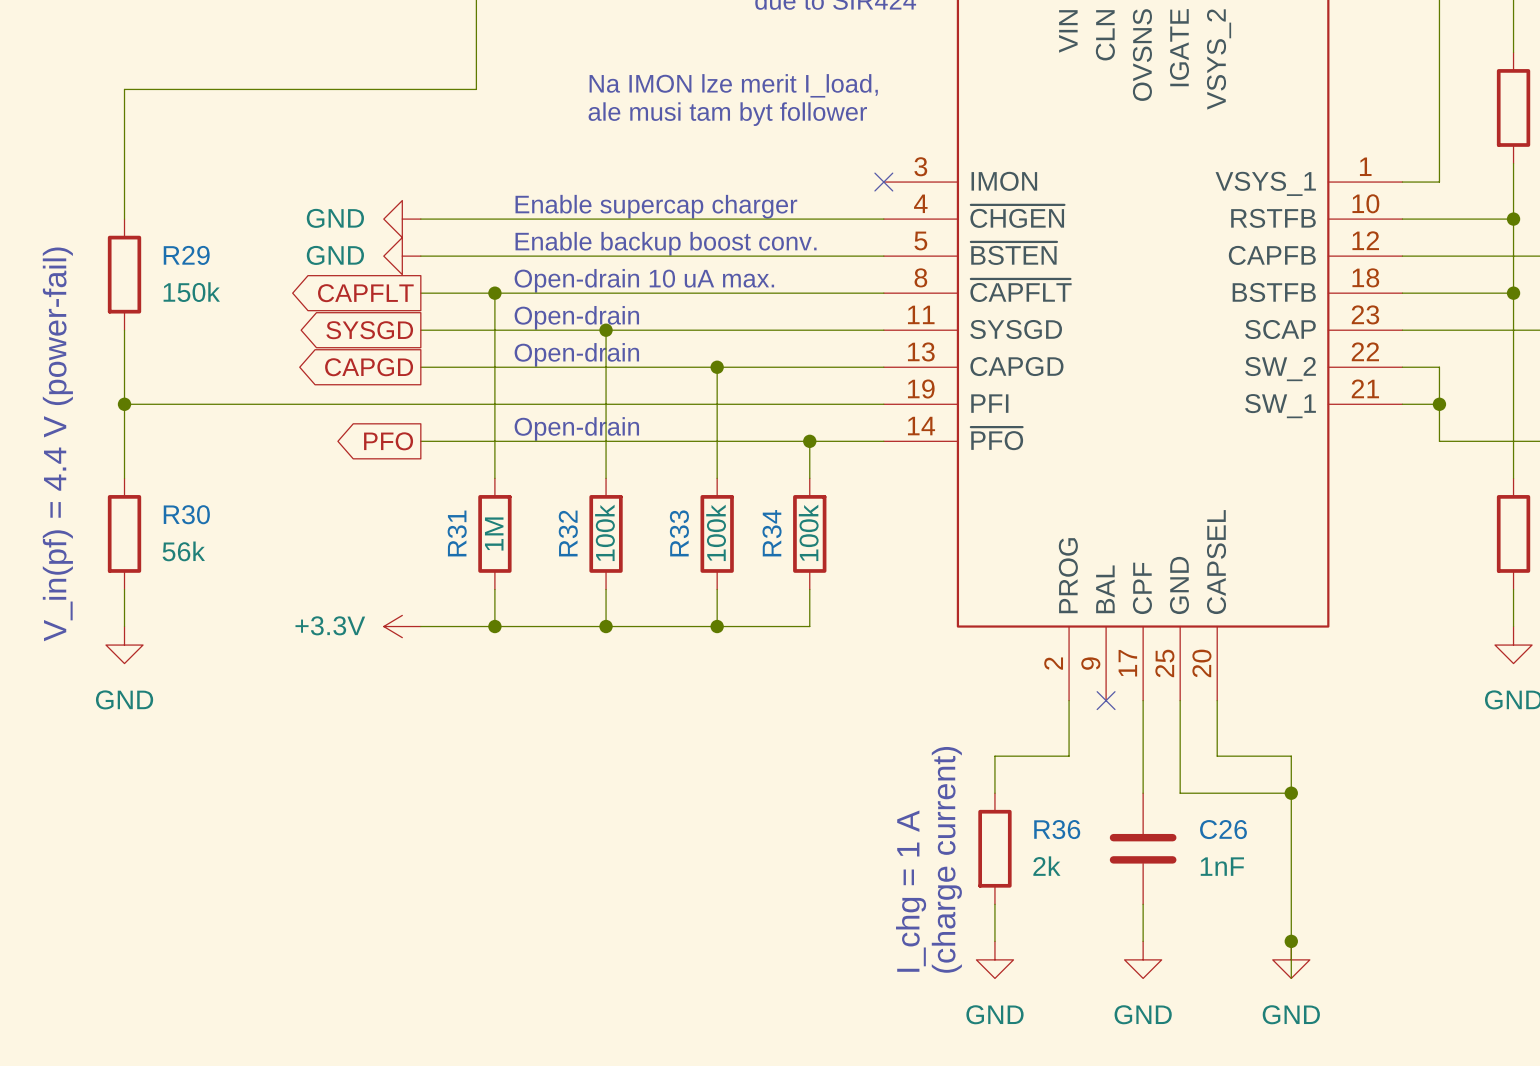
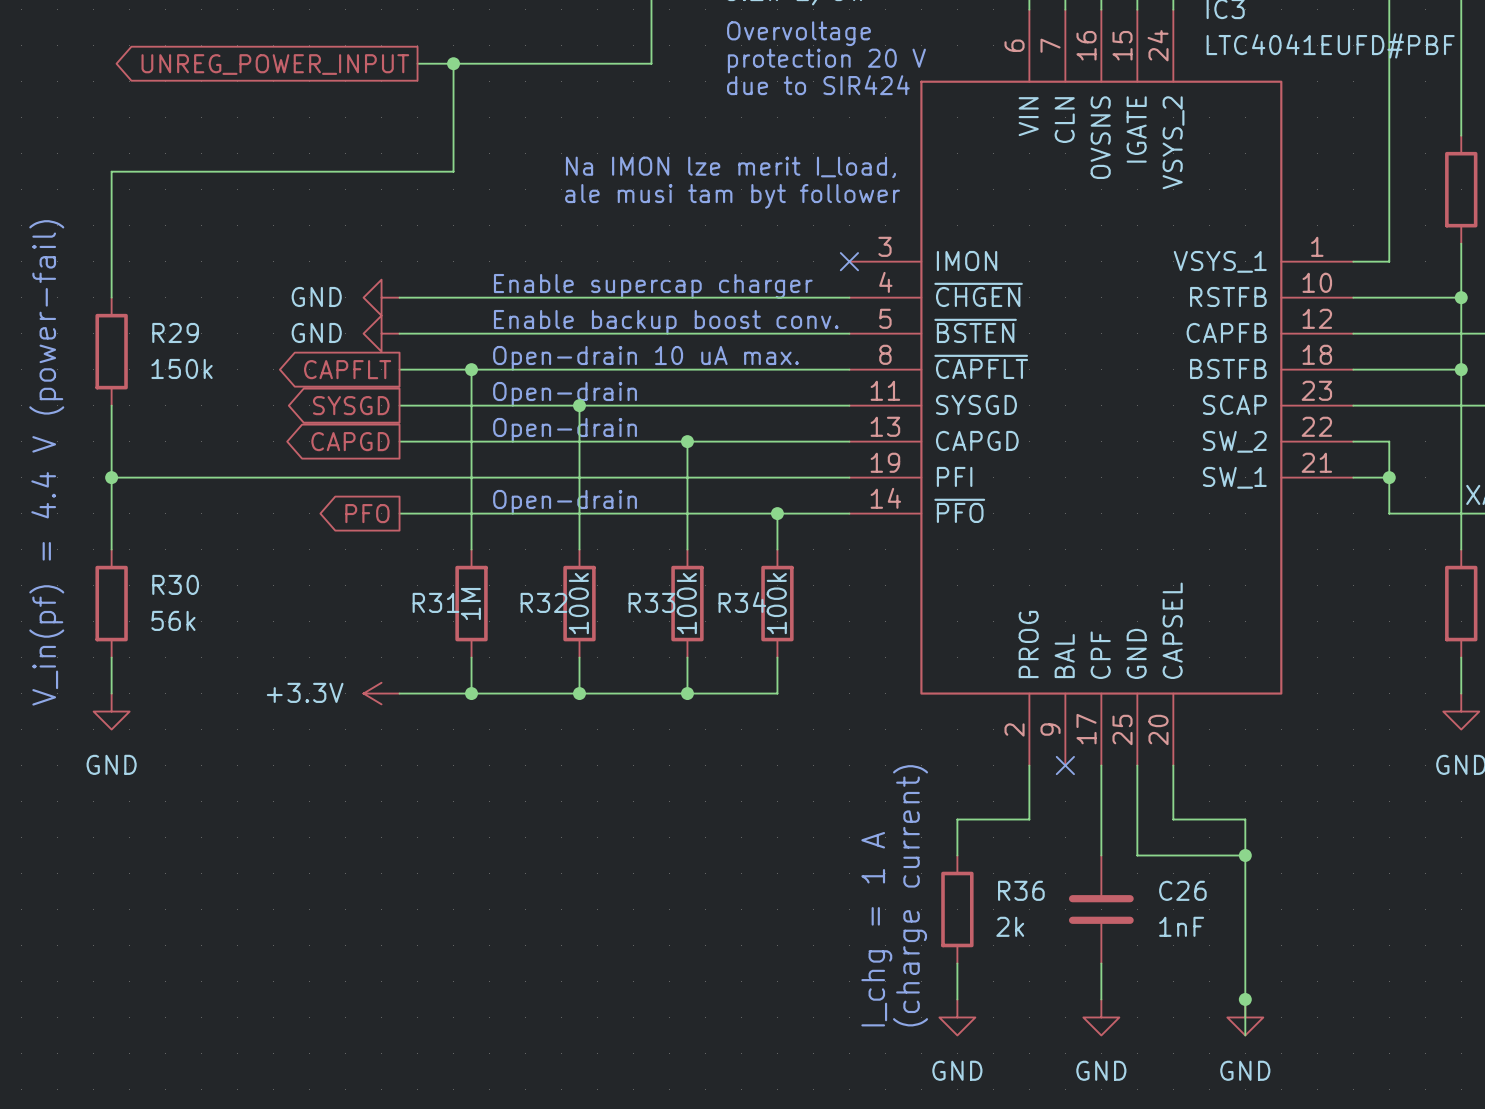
R31 name rotation: 0° (457, 533) -> 90° clockwise (435, 602)
R32 name rotation: 0° (568, 533) -> 90° clockwise (543, 602)
R33 name rotation: 0° (679, 533) -> 90° clockwise (651, 602)
R34 name rotation: 0° (772, 533) -> 90° clockwise (742, 602)

